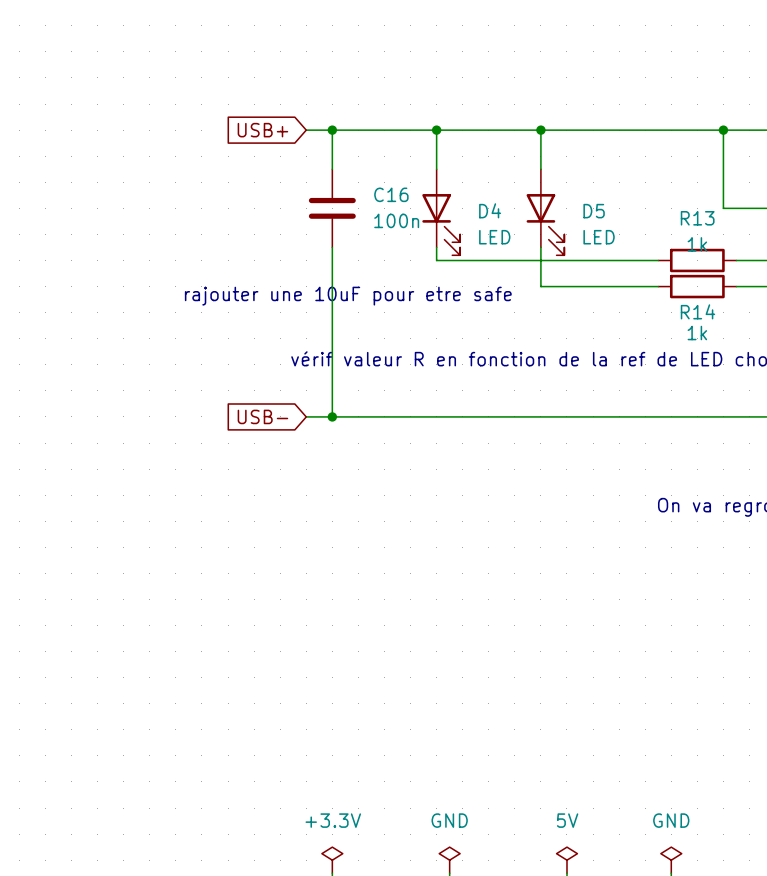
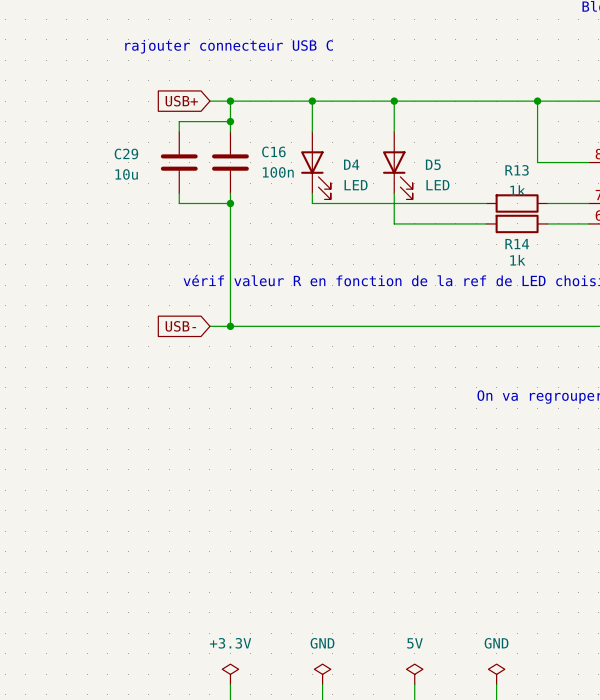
text: none -> rajouter connecteur USB C (229, 46)
wire: none -> (230, 121) (179, 121) (179, 131)
junction: none -> (230, 121)
C29: none -> 10u (179, 162)
wire: none -> (179, 193) (179, 203) (230, 203)
junction: none -> (230, 203)
text: rajouter une 10uF pour etre safe (348, 296) -> none

